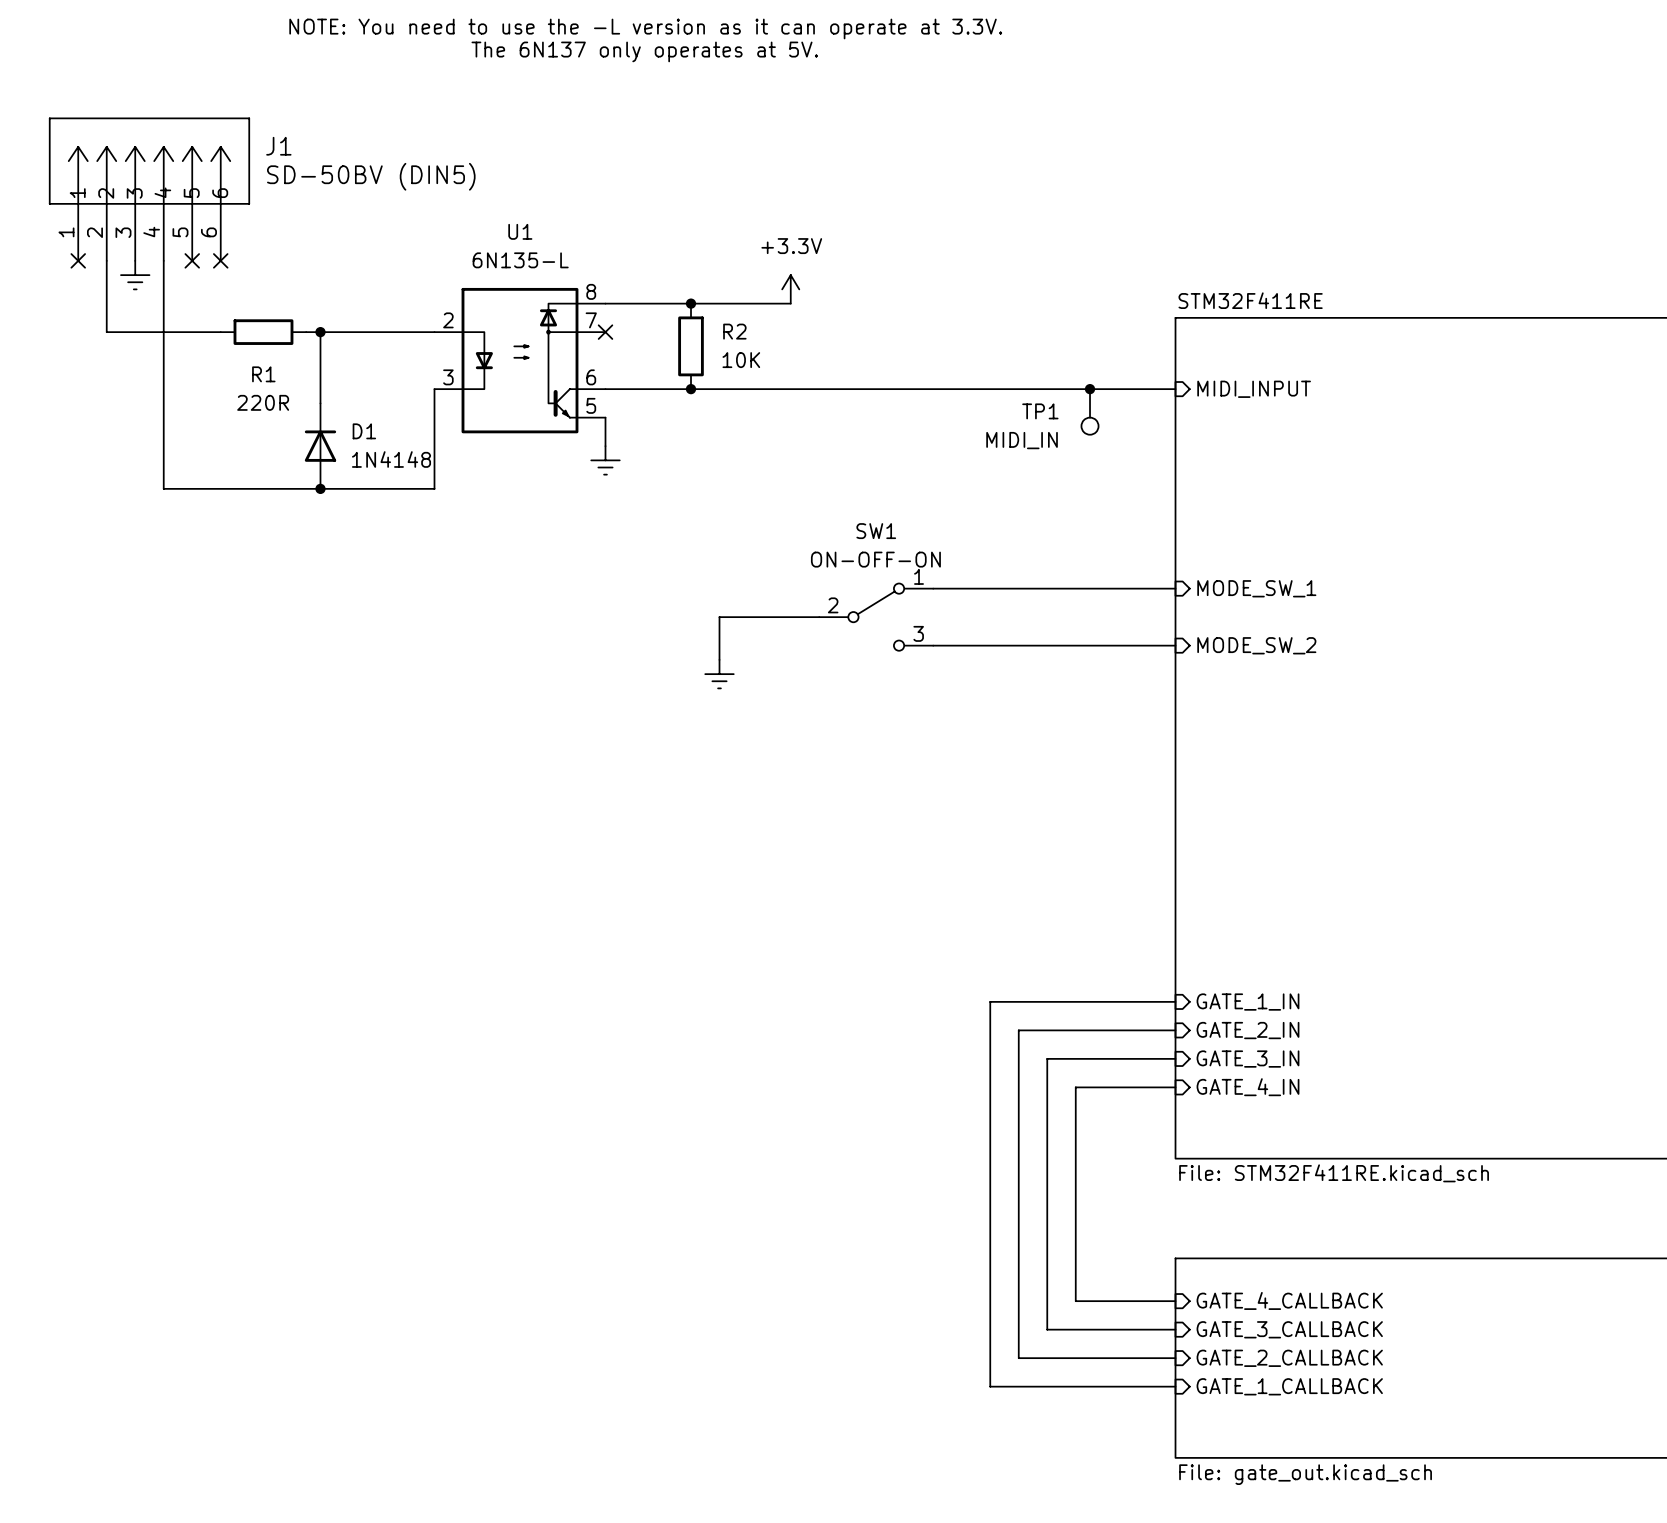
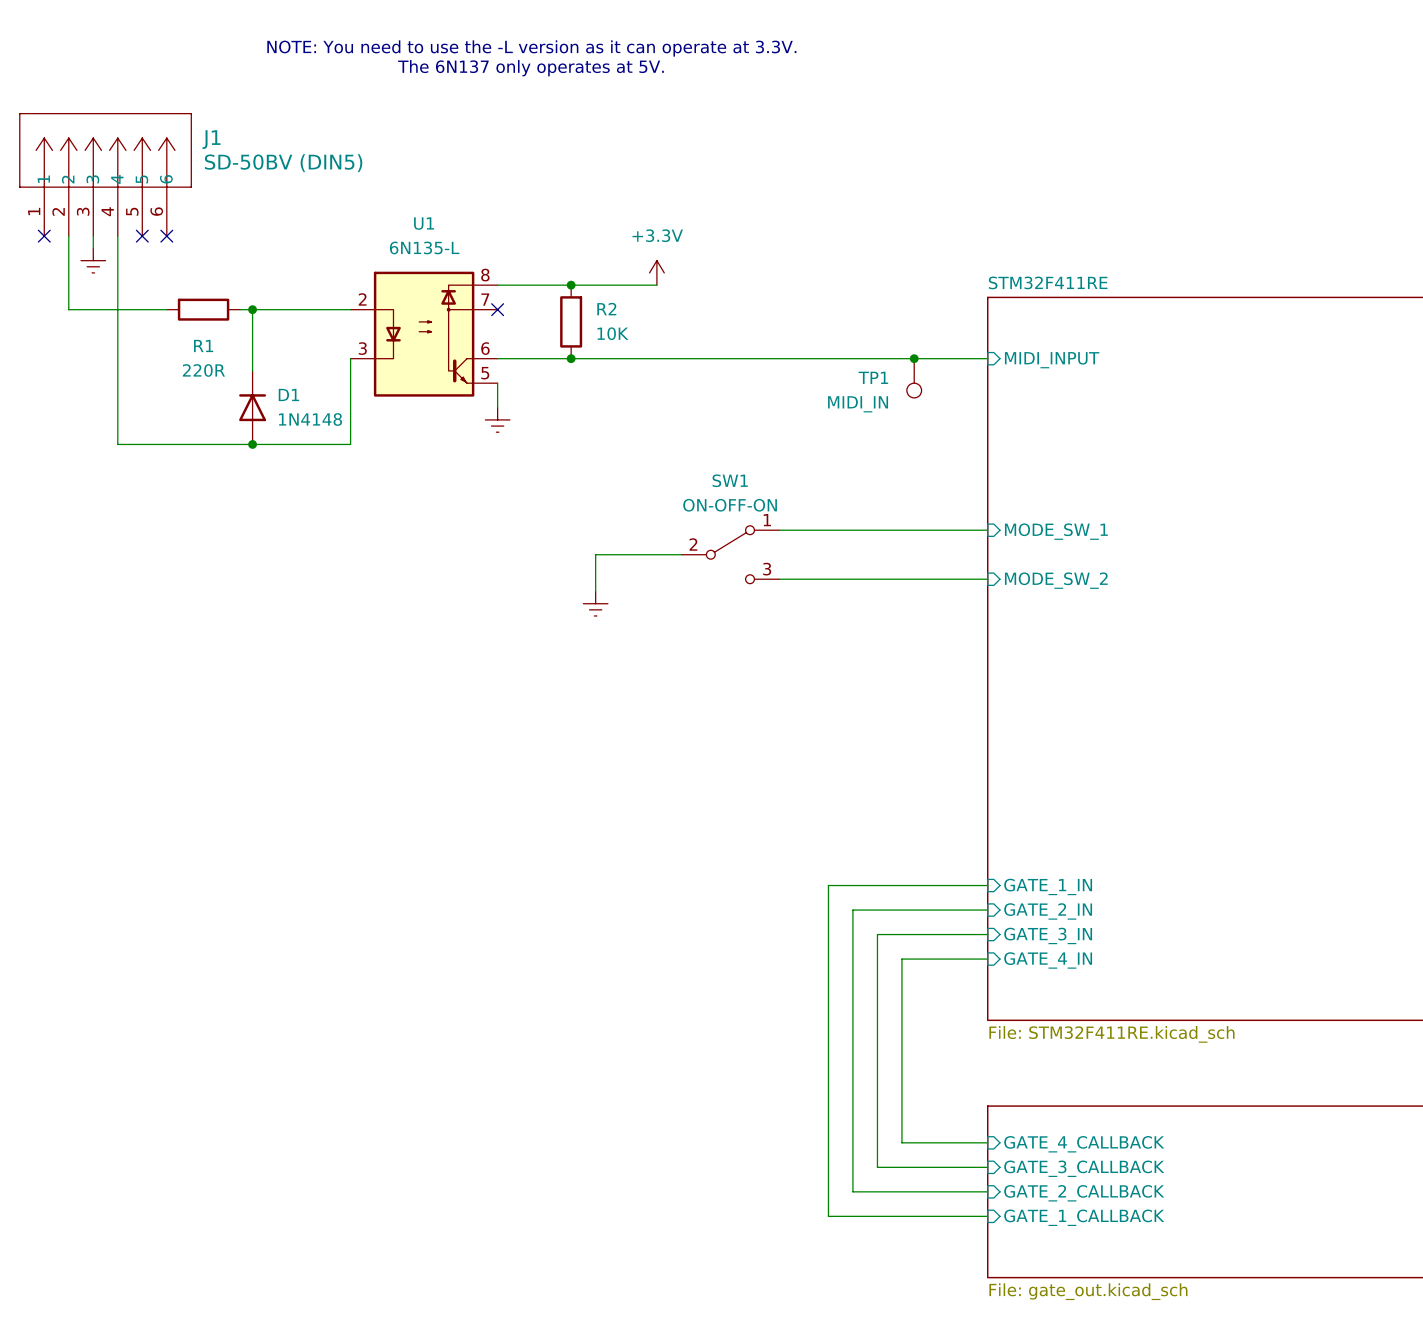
J1 position: (149, 189) -> (105, 174)
no-connect mark position: (78, 260) -> (44, 236)
no-connect mark position: (192, 260) -> (142, 236)
no-connect mark position: (220, 260) -> (166, 236)

